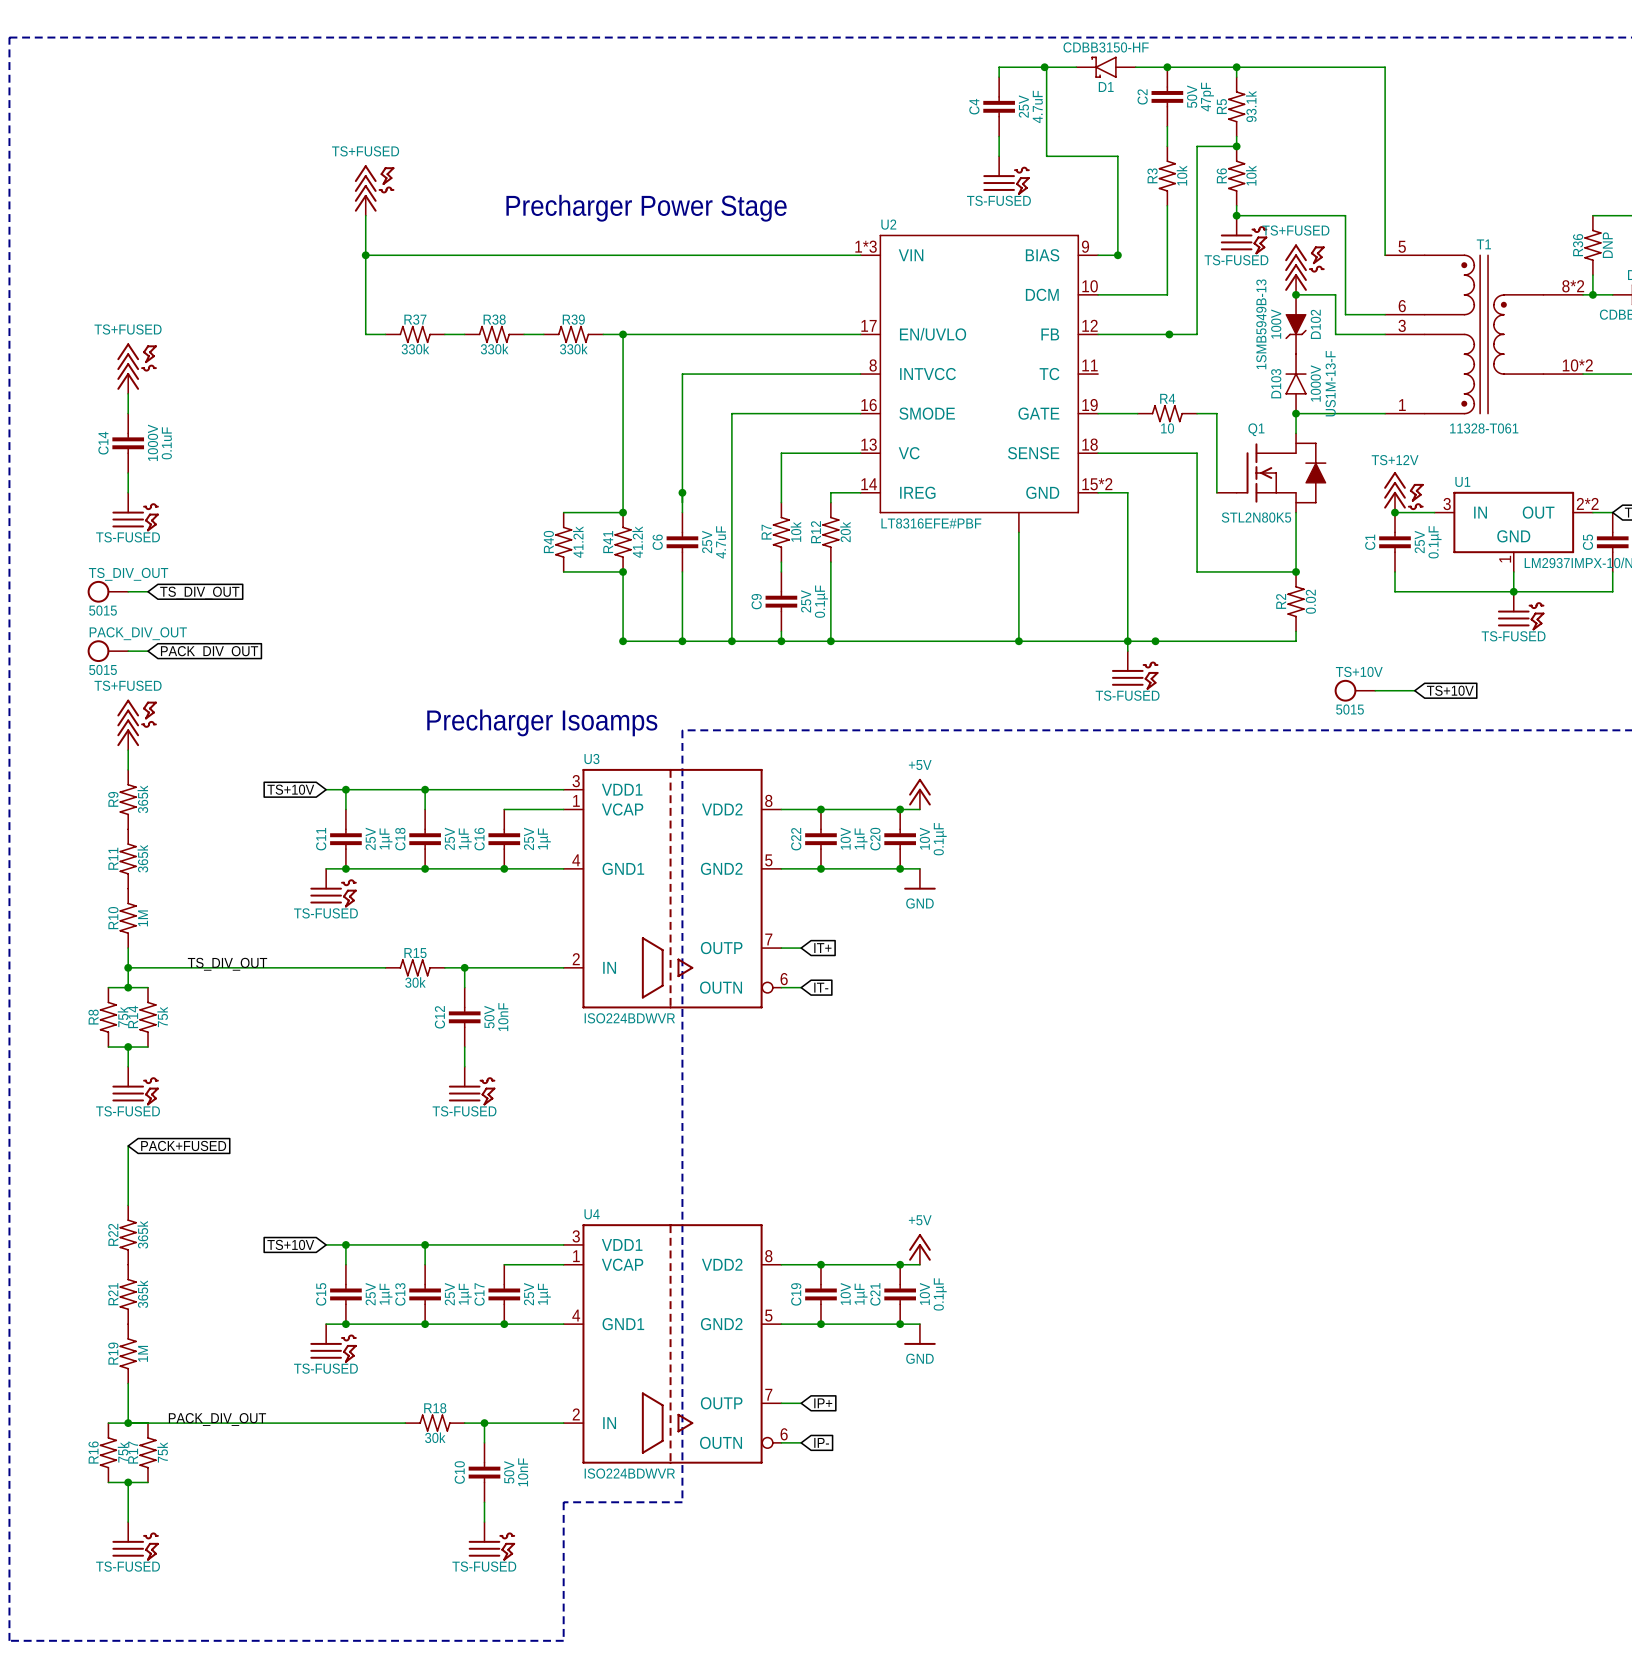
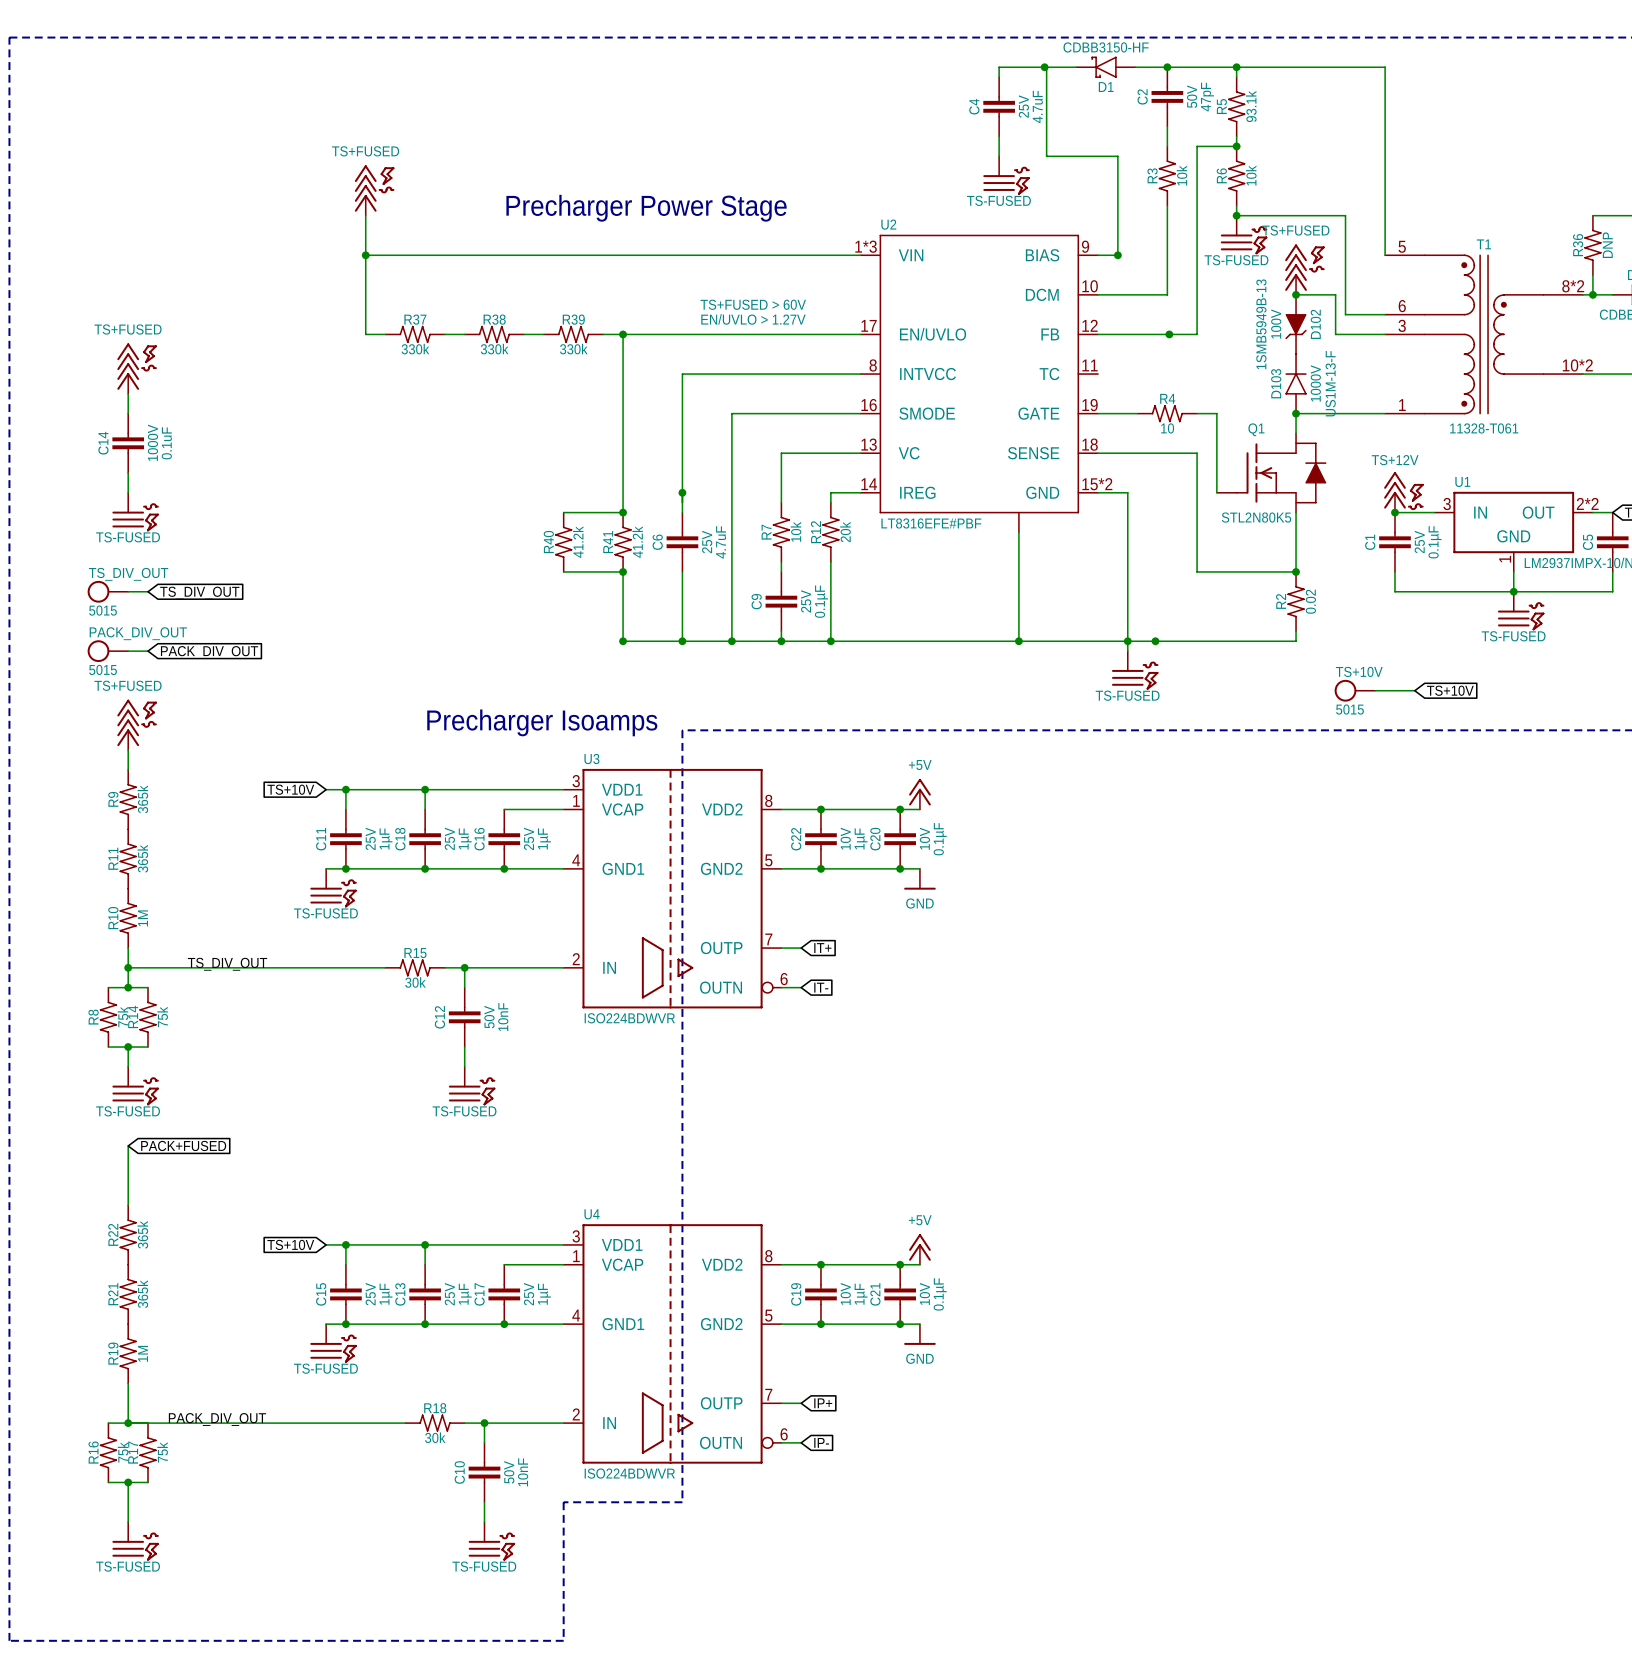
text: none -> TS+FUSED > 60V (753, 304)
text: none -> EN/UVLO > 1.27V (753, 319)

